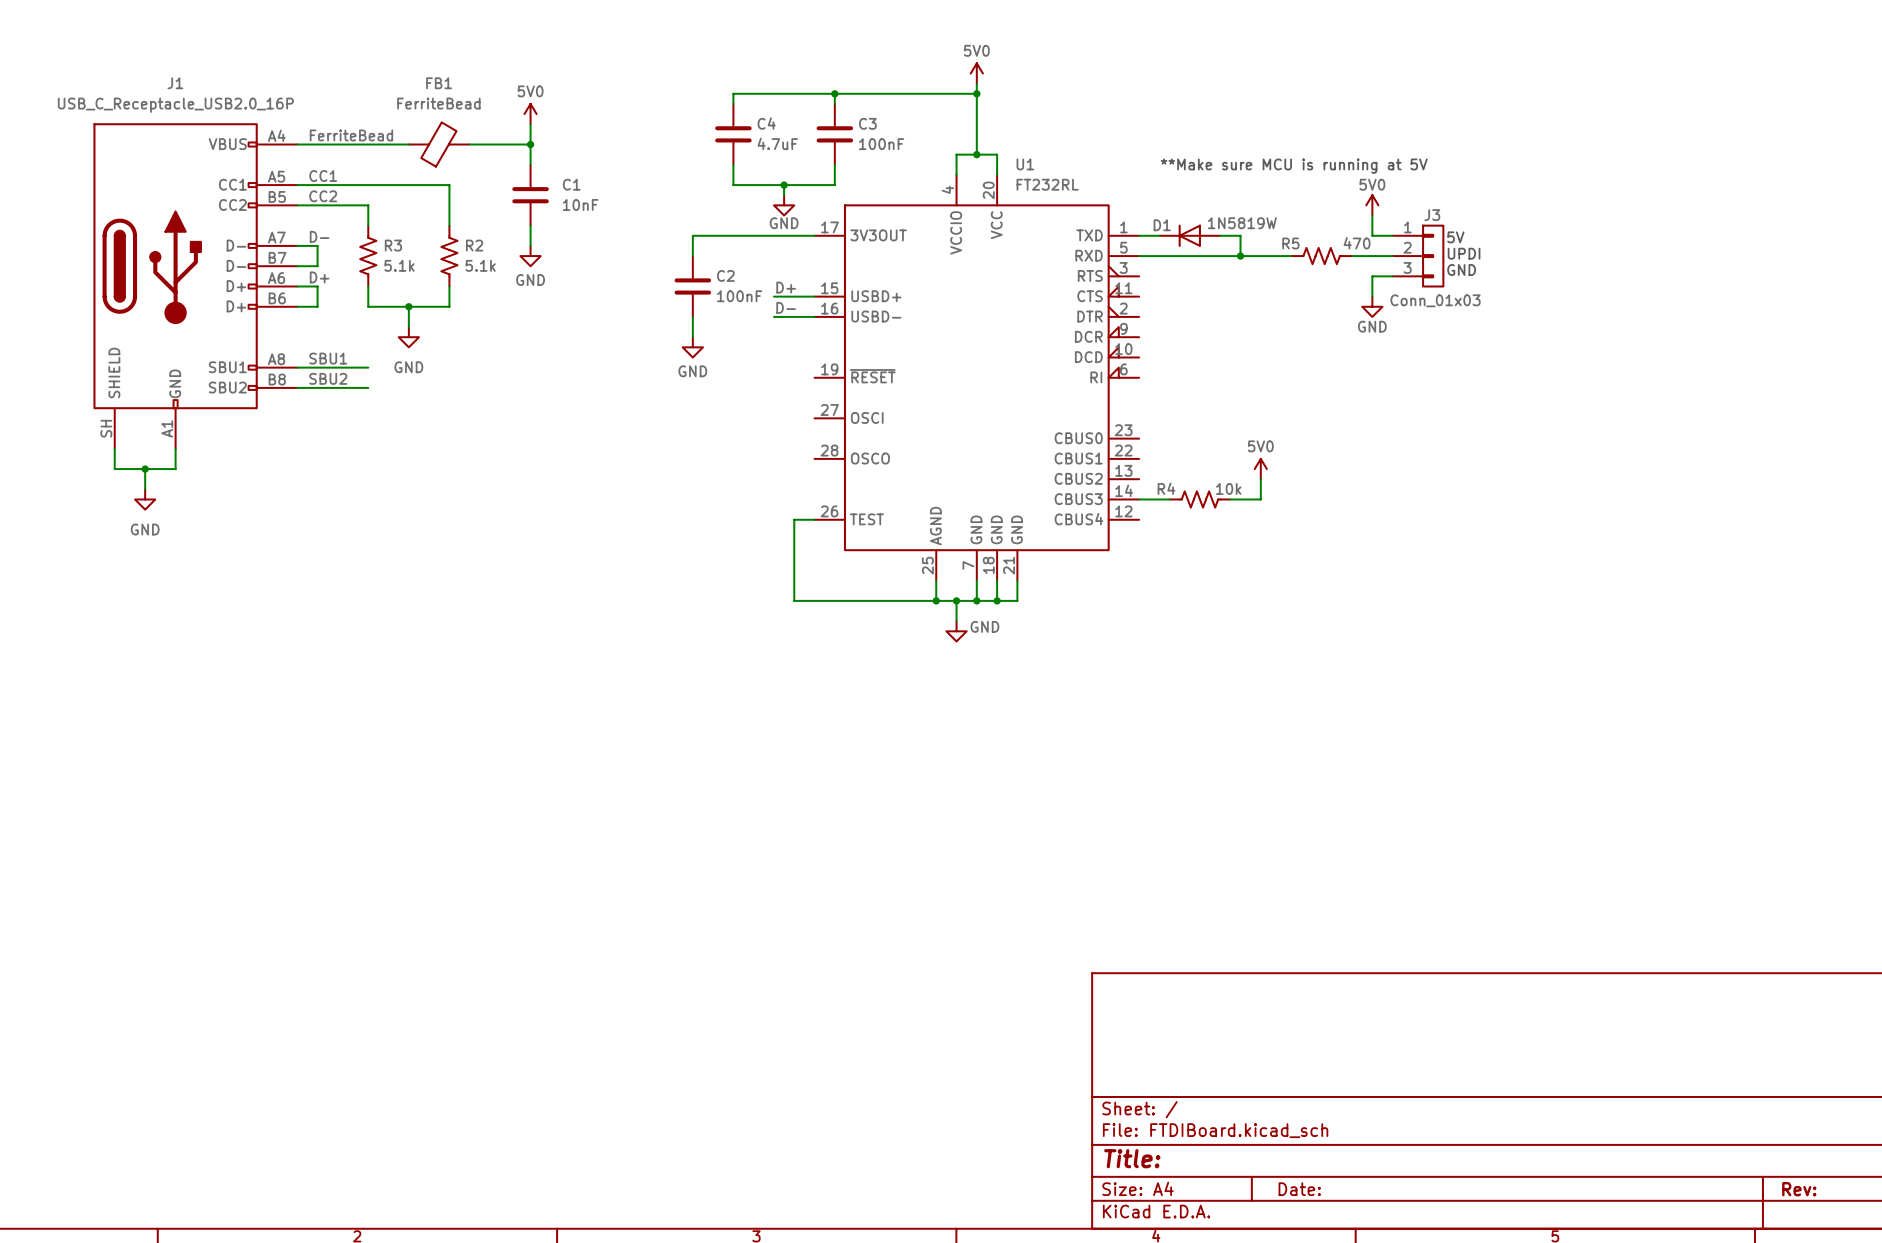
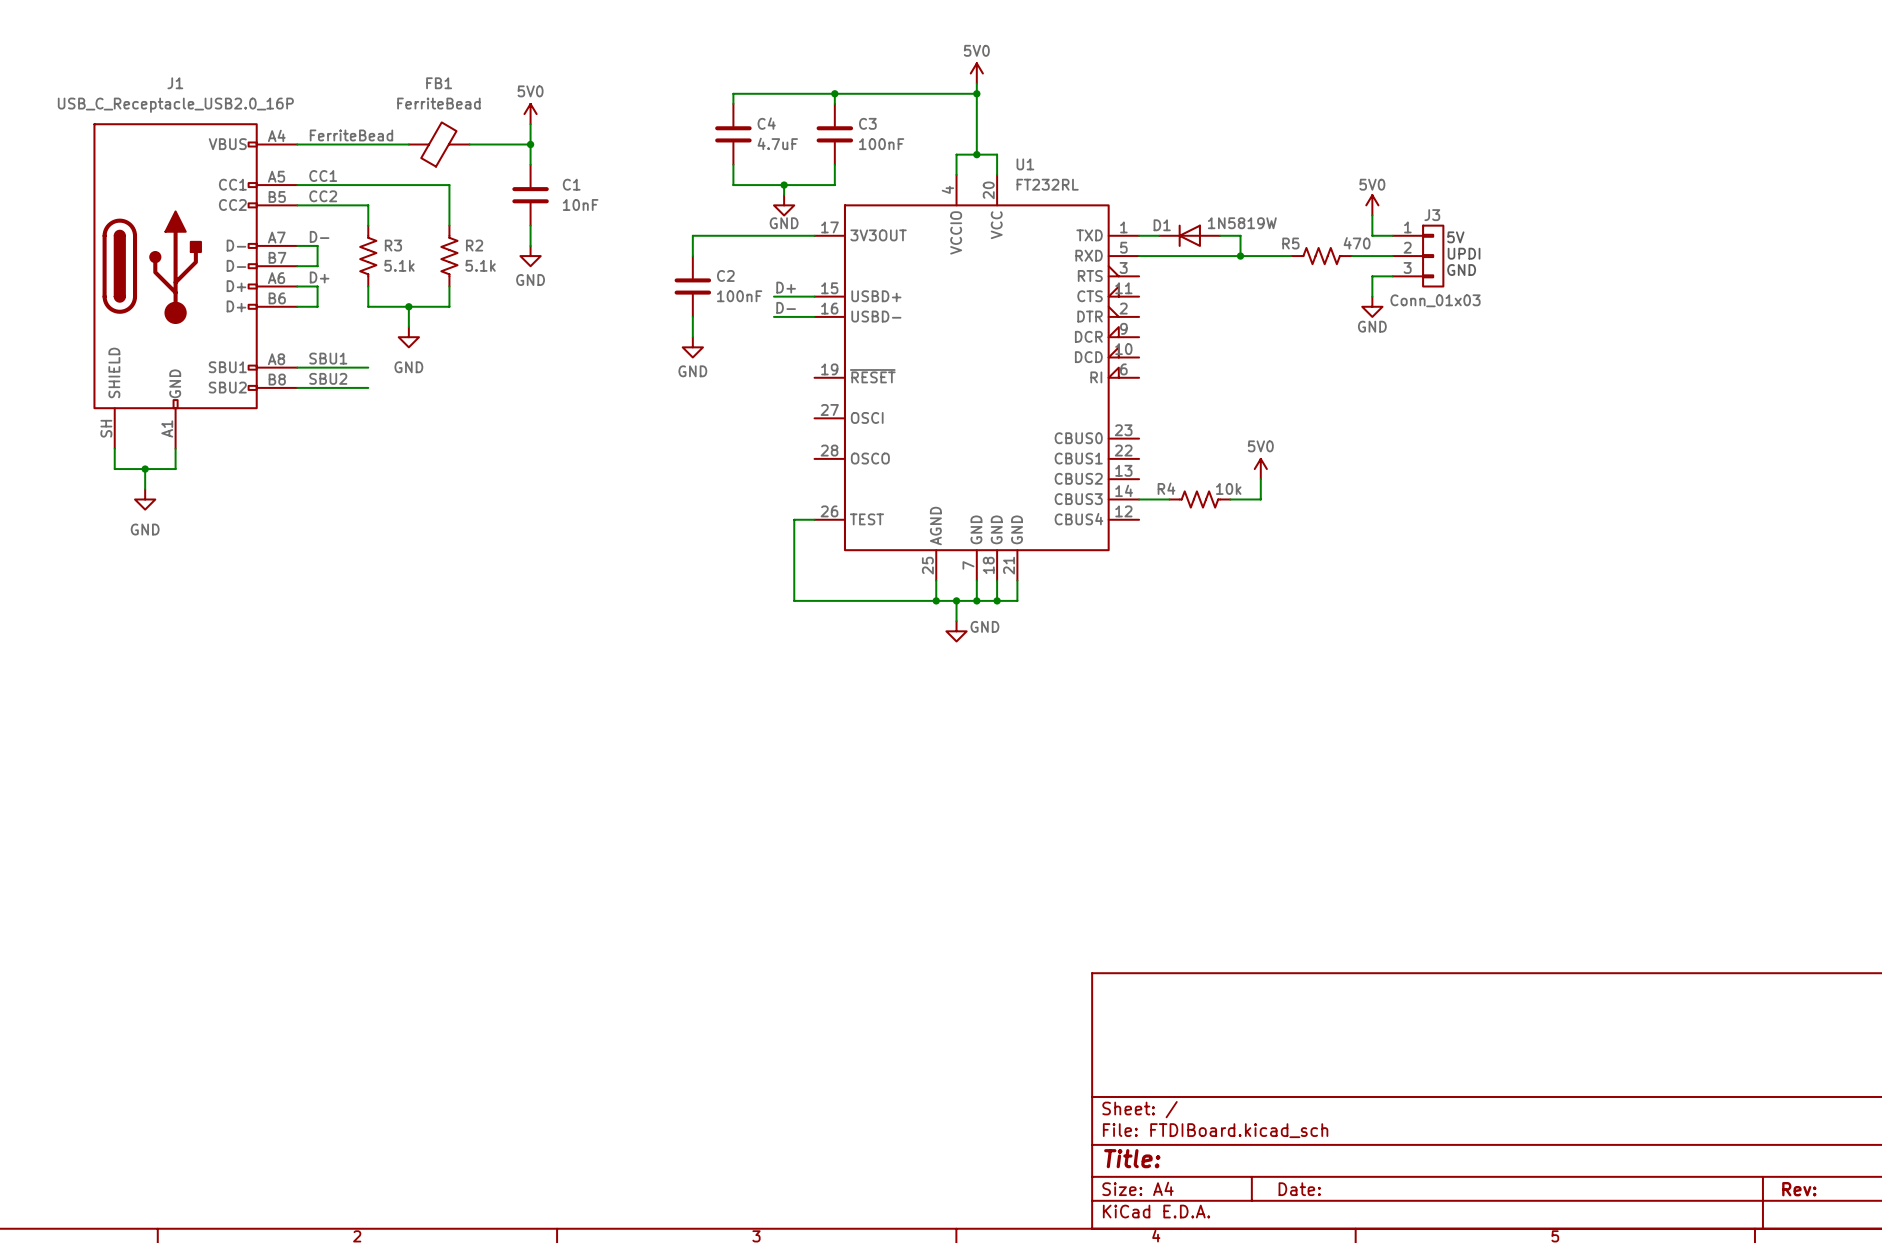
text: **Make sure MCU is running at 5V (1294, 166) -> none

